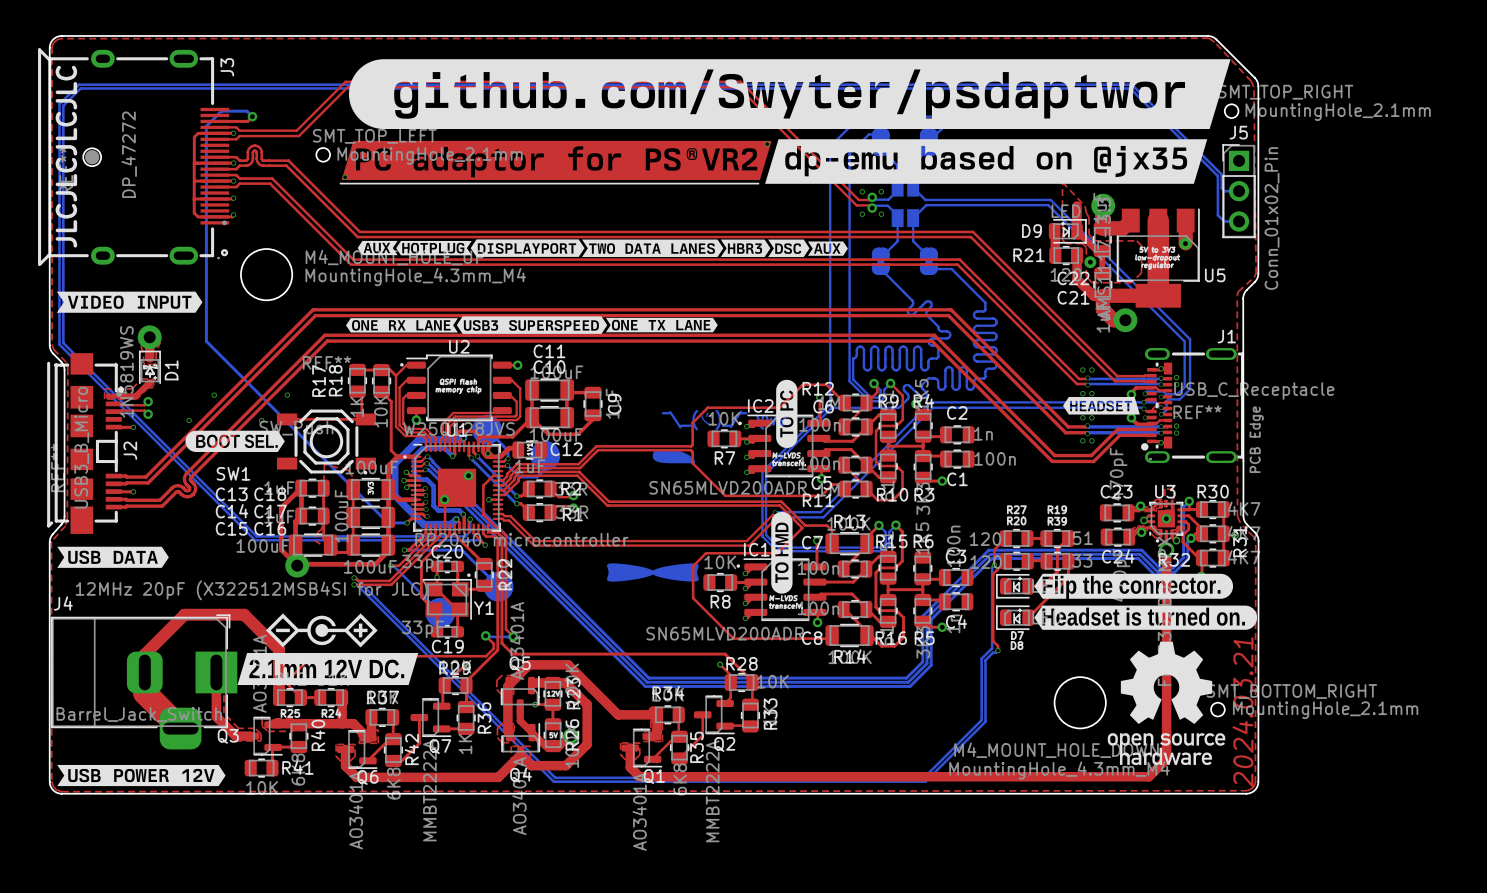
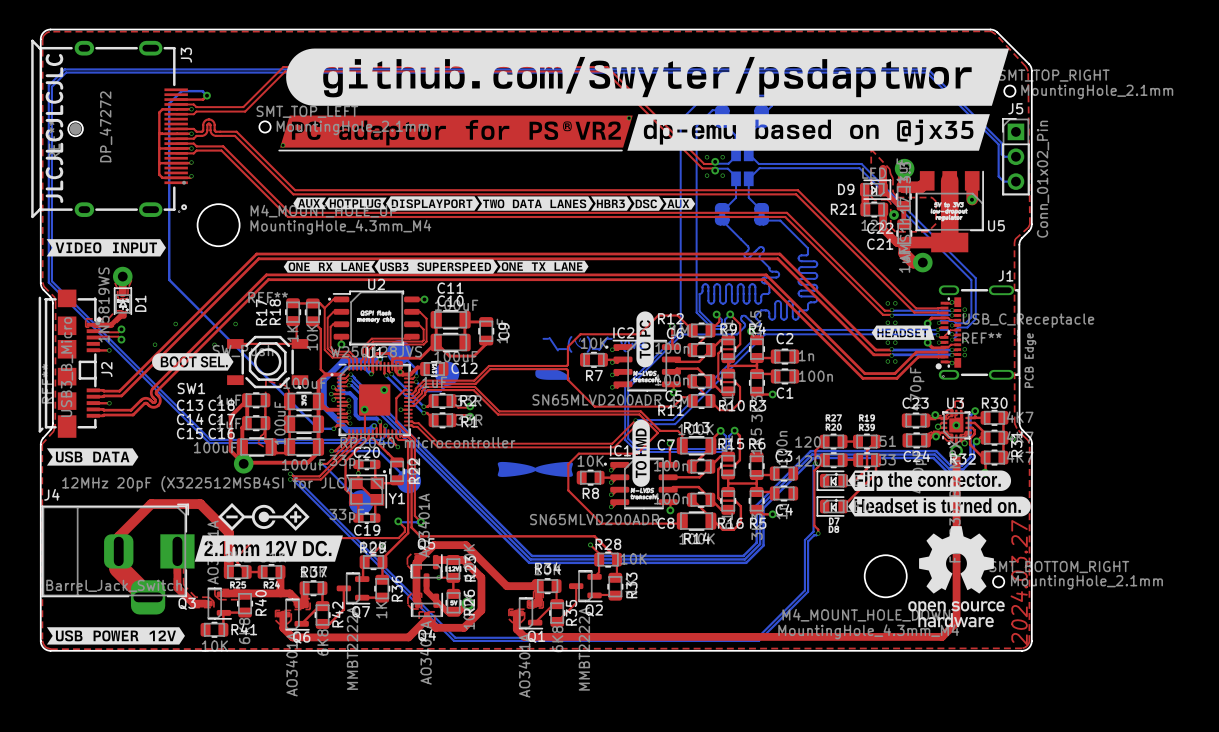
text: 2024.03.21 (1242, 712) -> 2024.03.27 (1019, 582)

